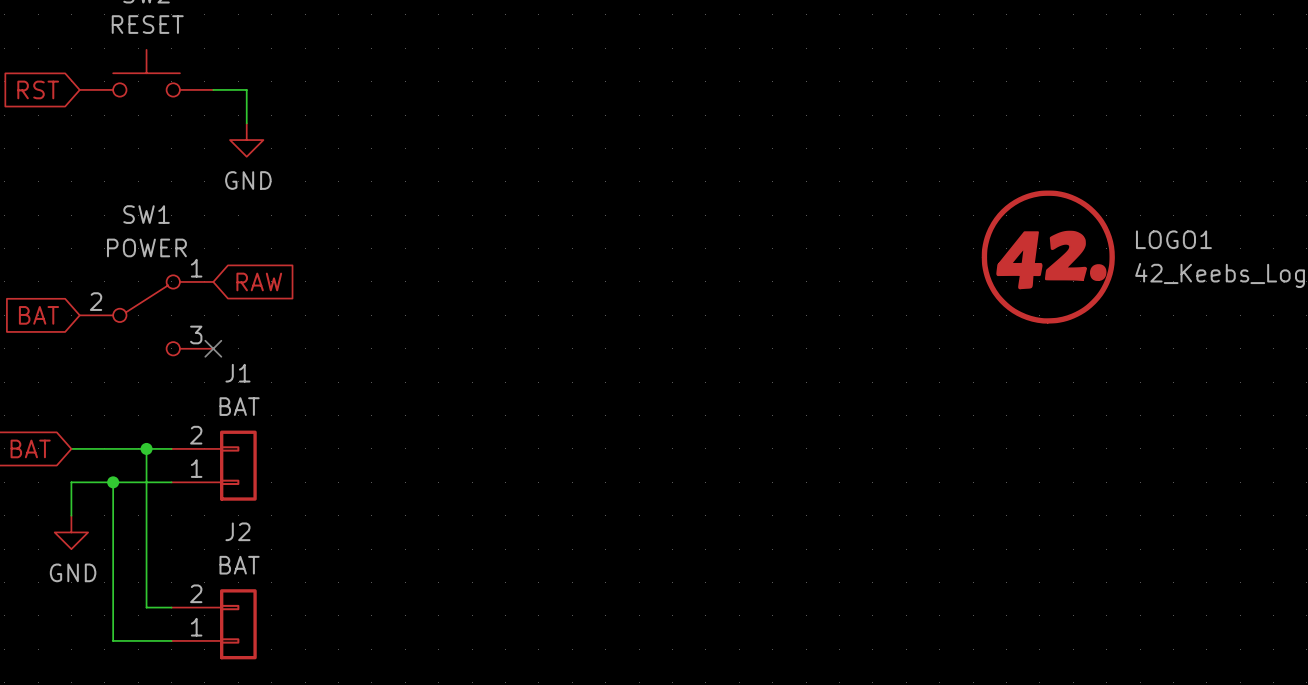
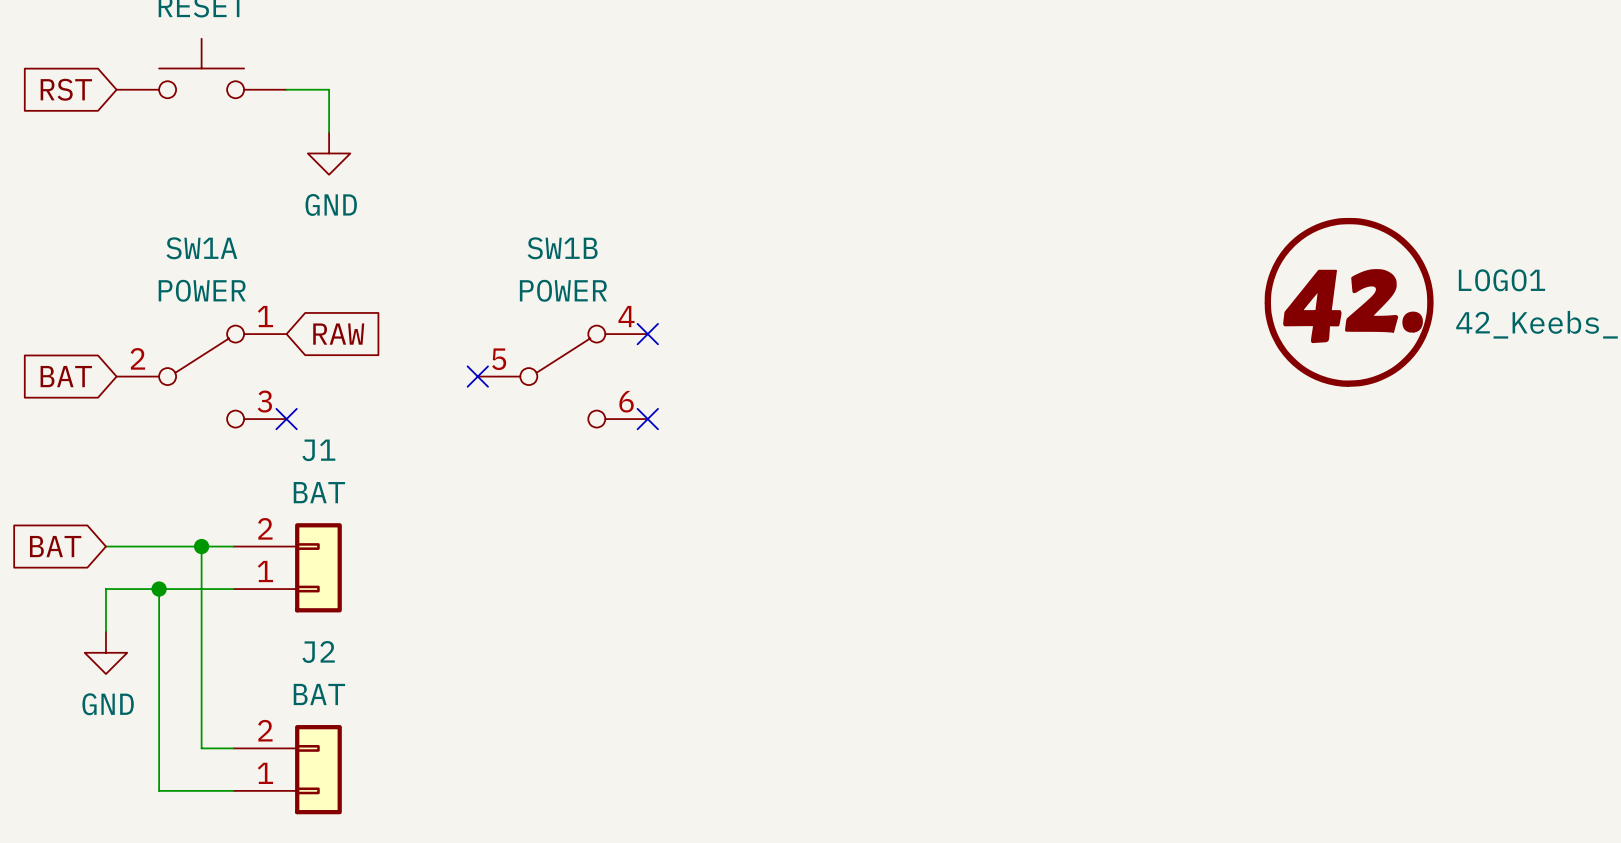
SW1 name: SW1 (146, 214) -> SW1A (201, 248)
no-connect mark: none -> (647, 334)
no-connect mark: none -> (477, 376)
SW1B: none -> POWER (562, 376)
no-connect mark: none -> (647, 419)

